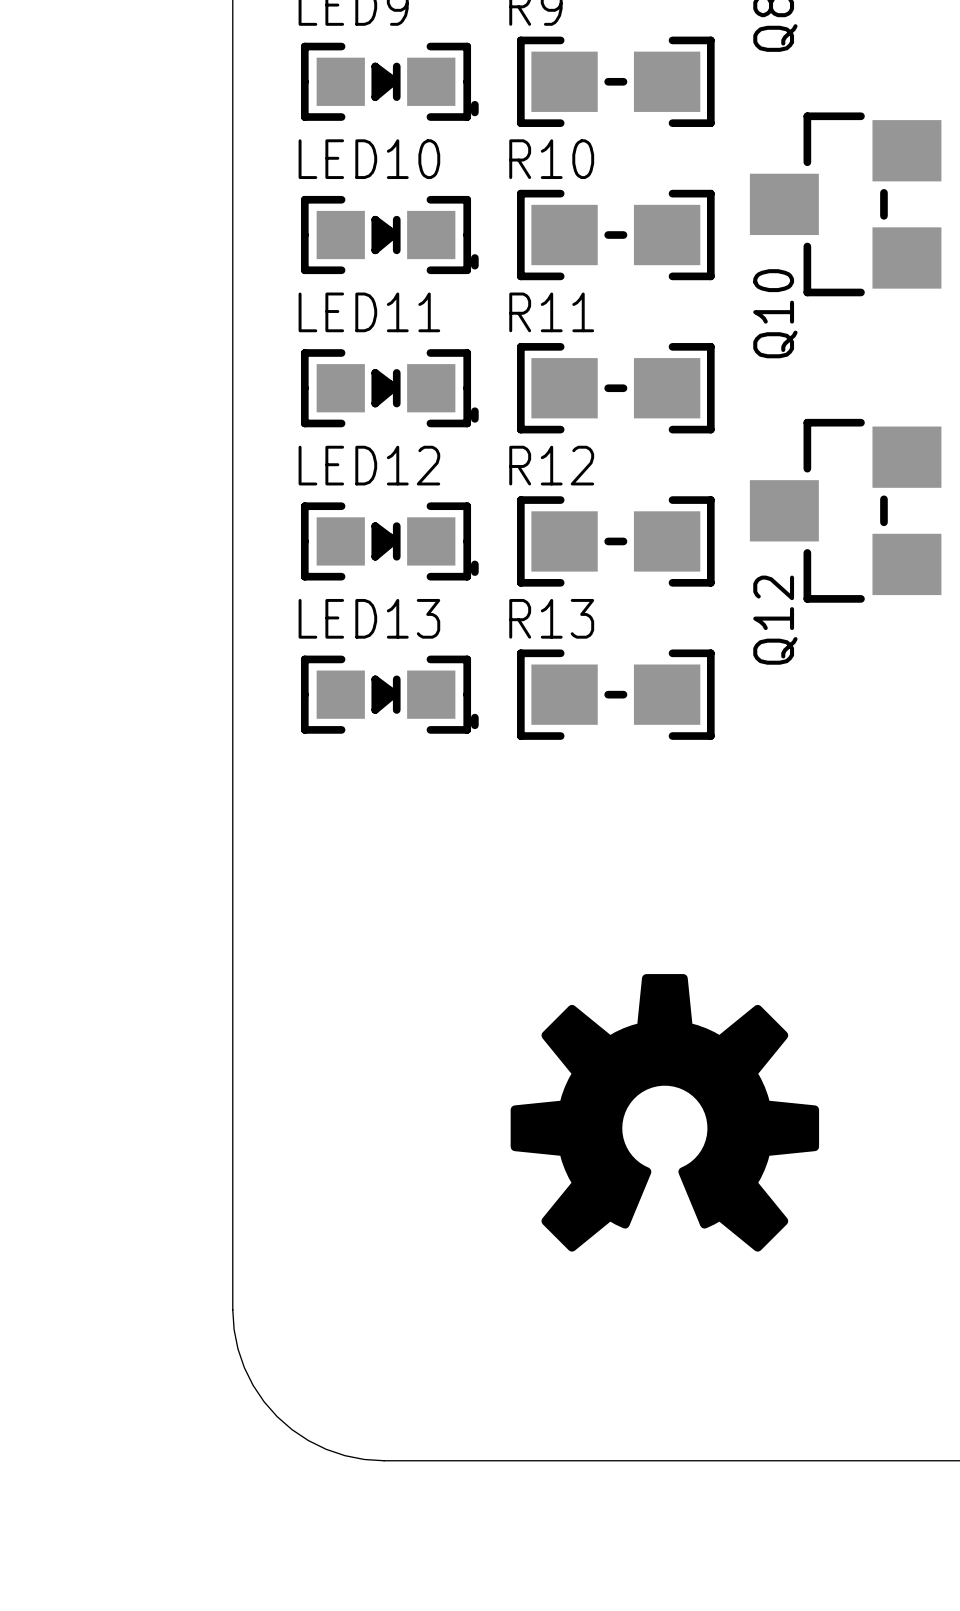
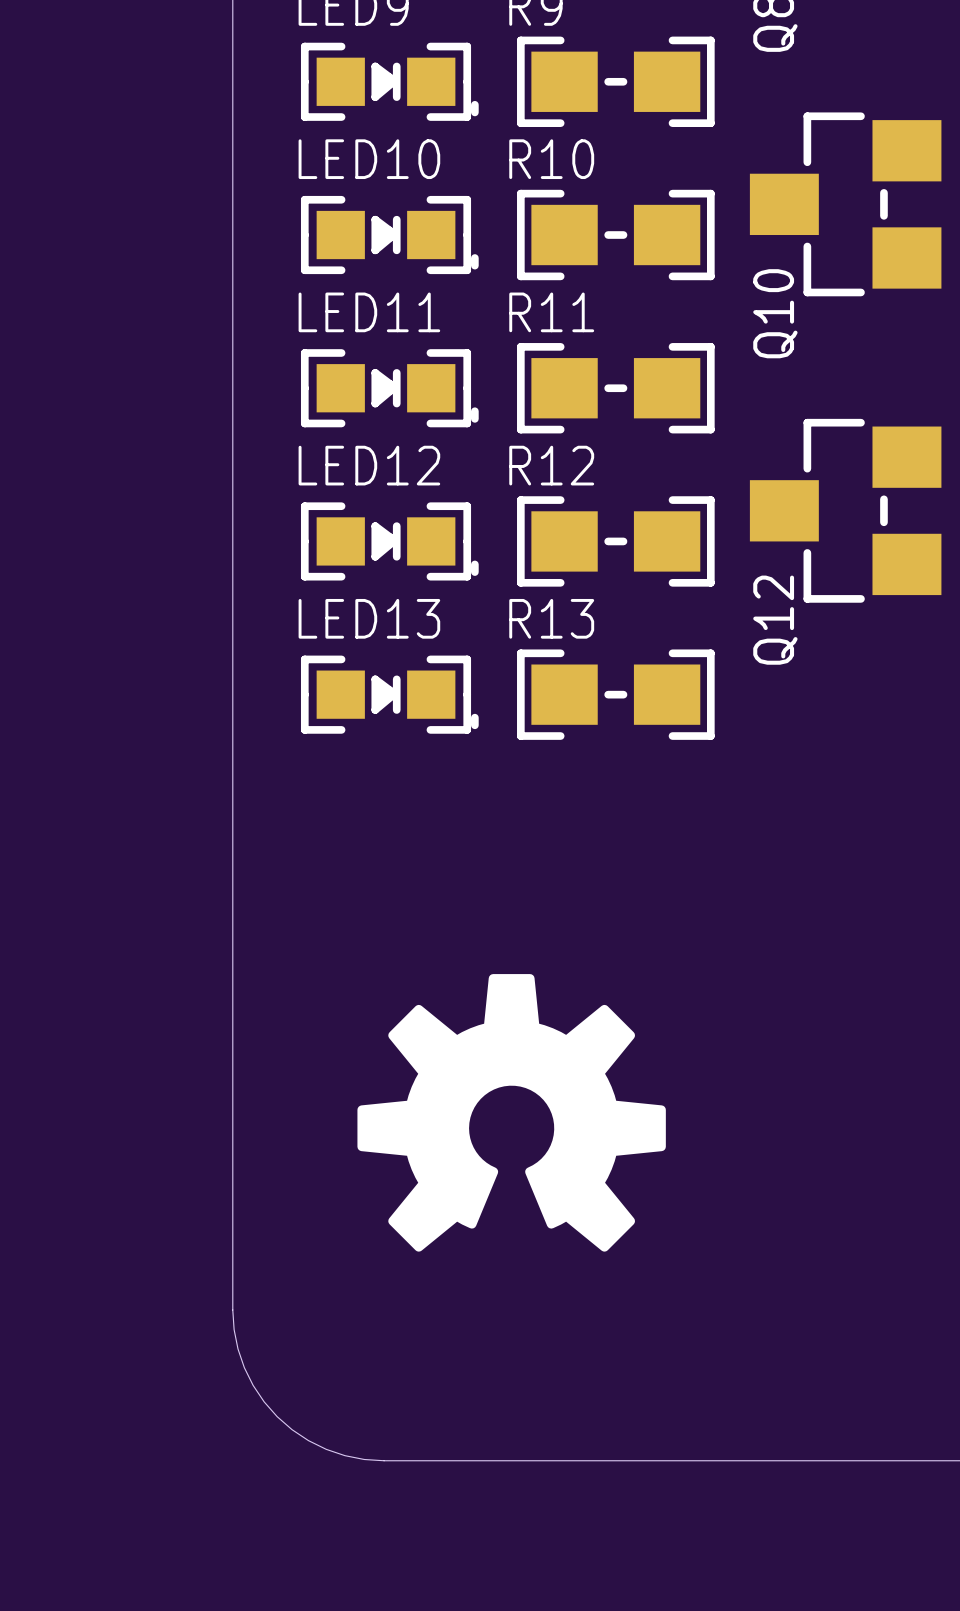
drawing position: (664, 1112) -> (511, 1112)

